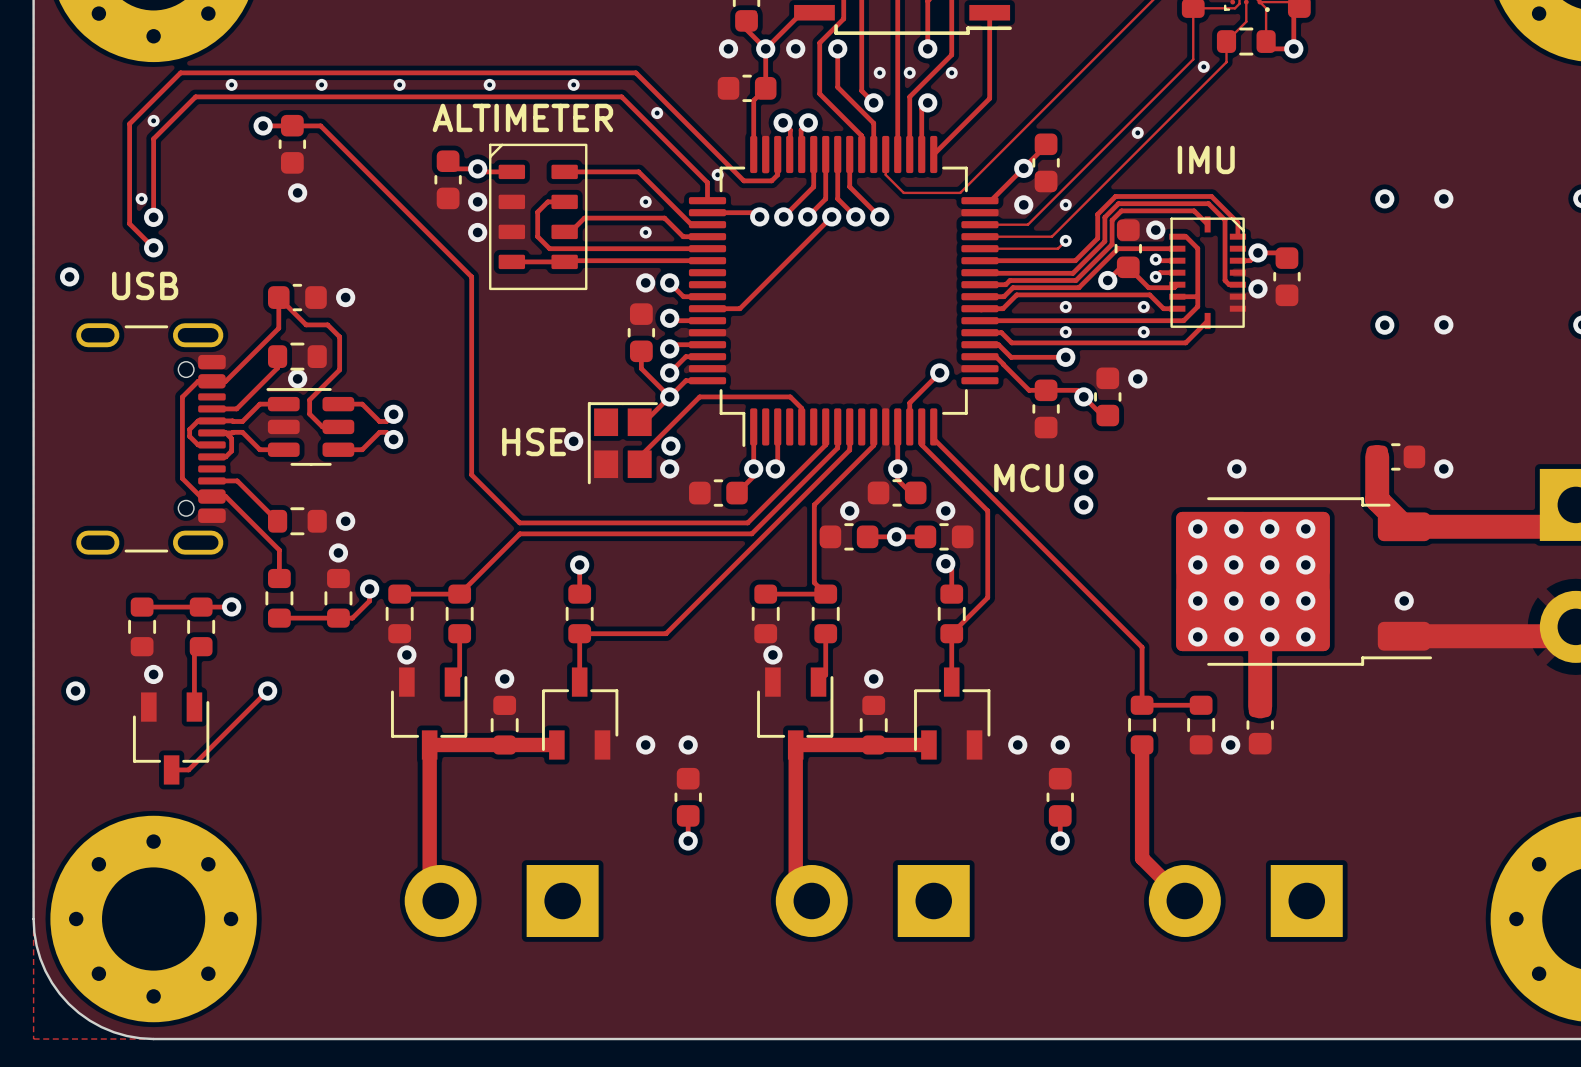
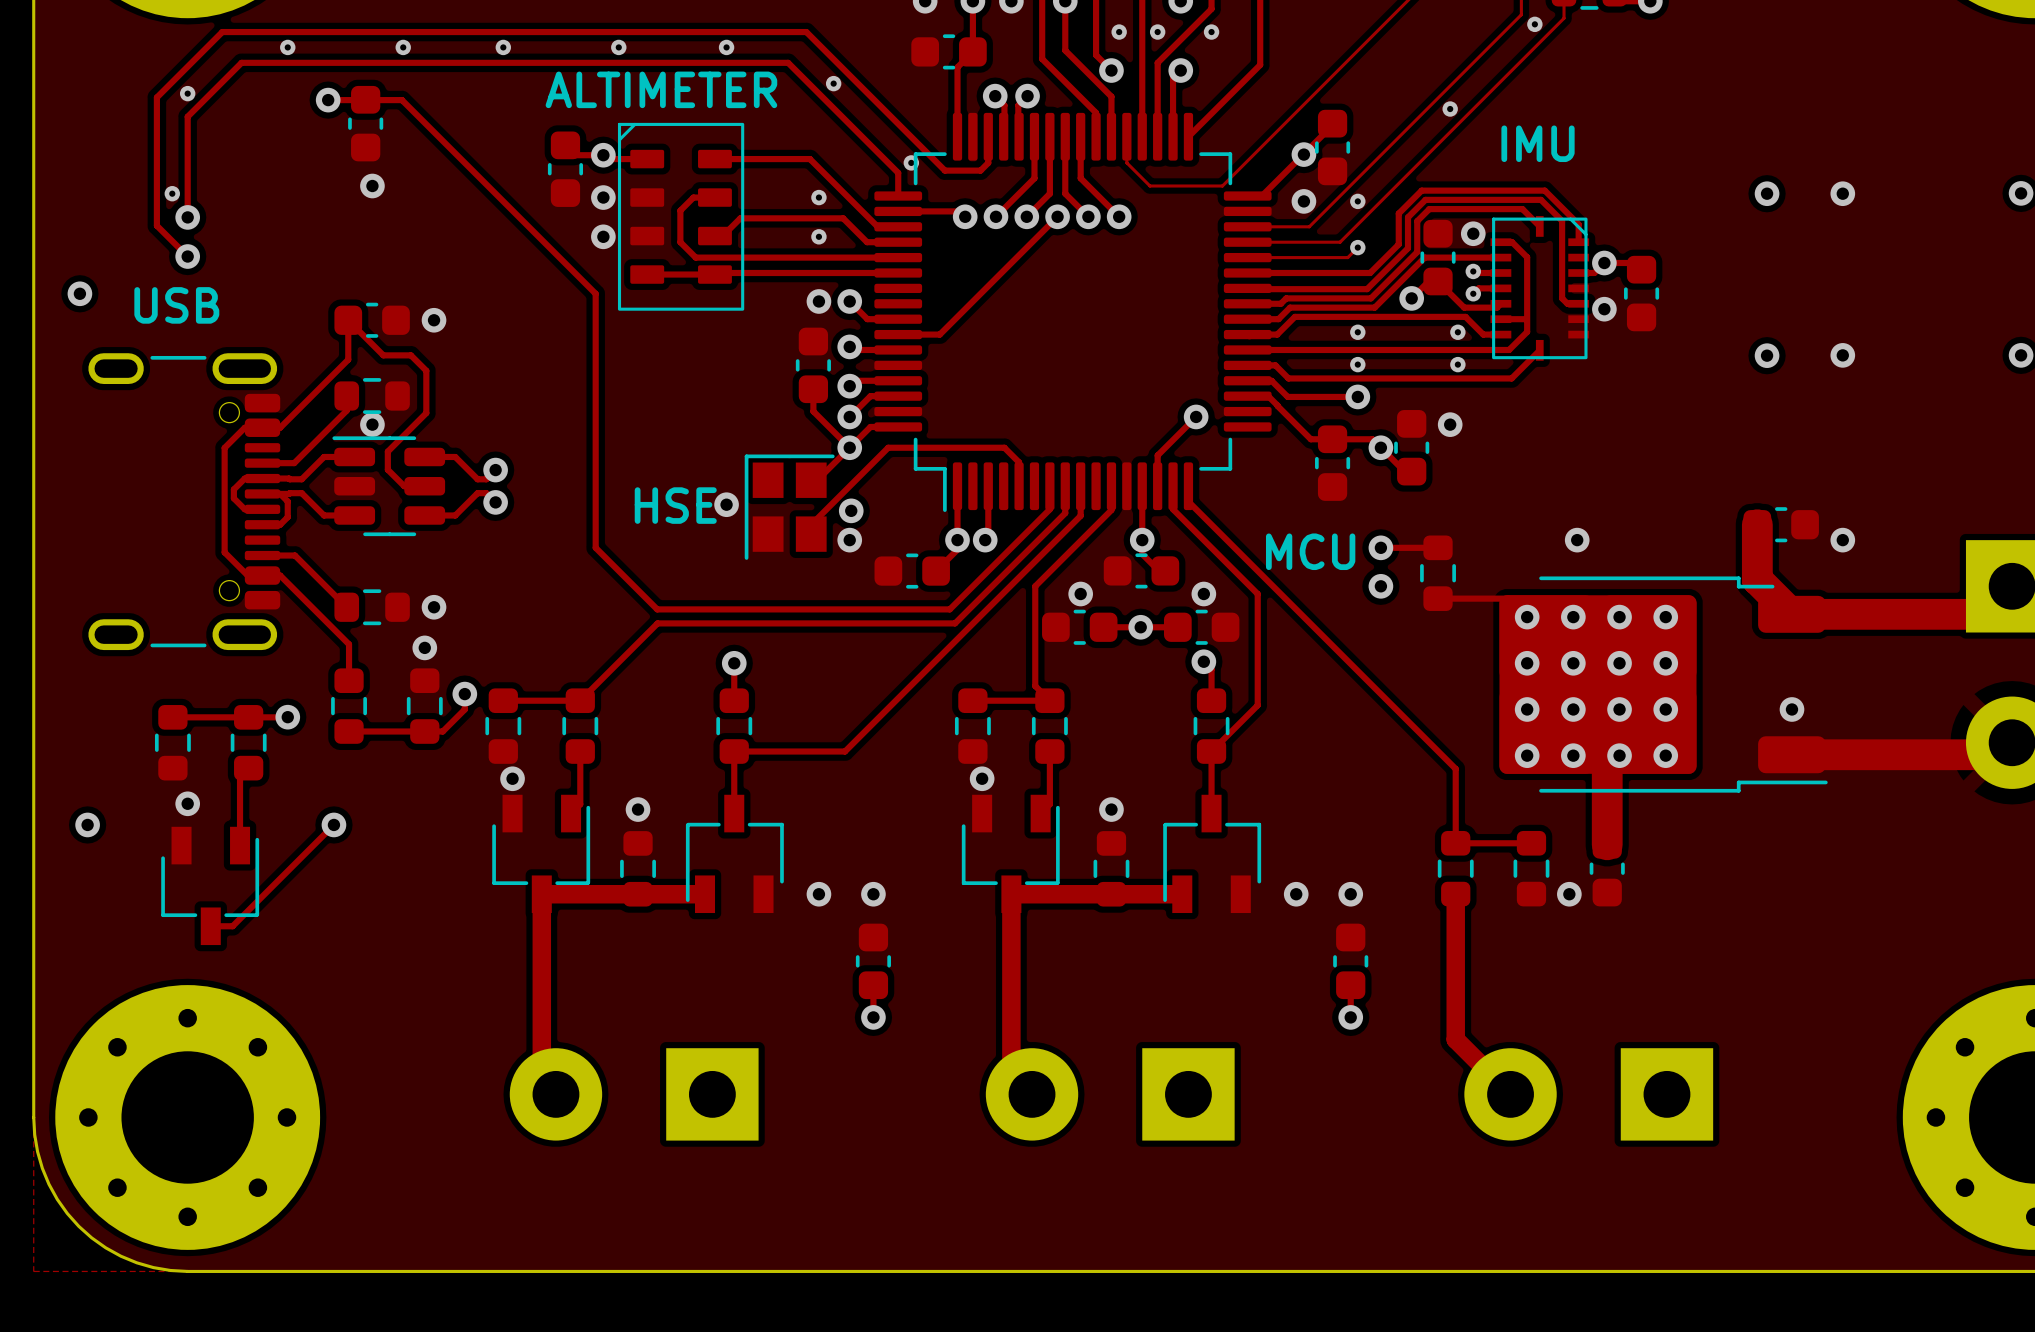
track: none -> (1380, 547) (1438, 547)
part: none -> (1438, 573)
track: none -> (1438, 598) (1508, 598) (1527, 617)

